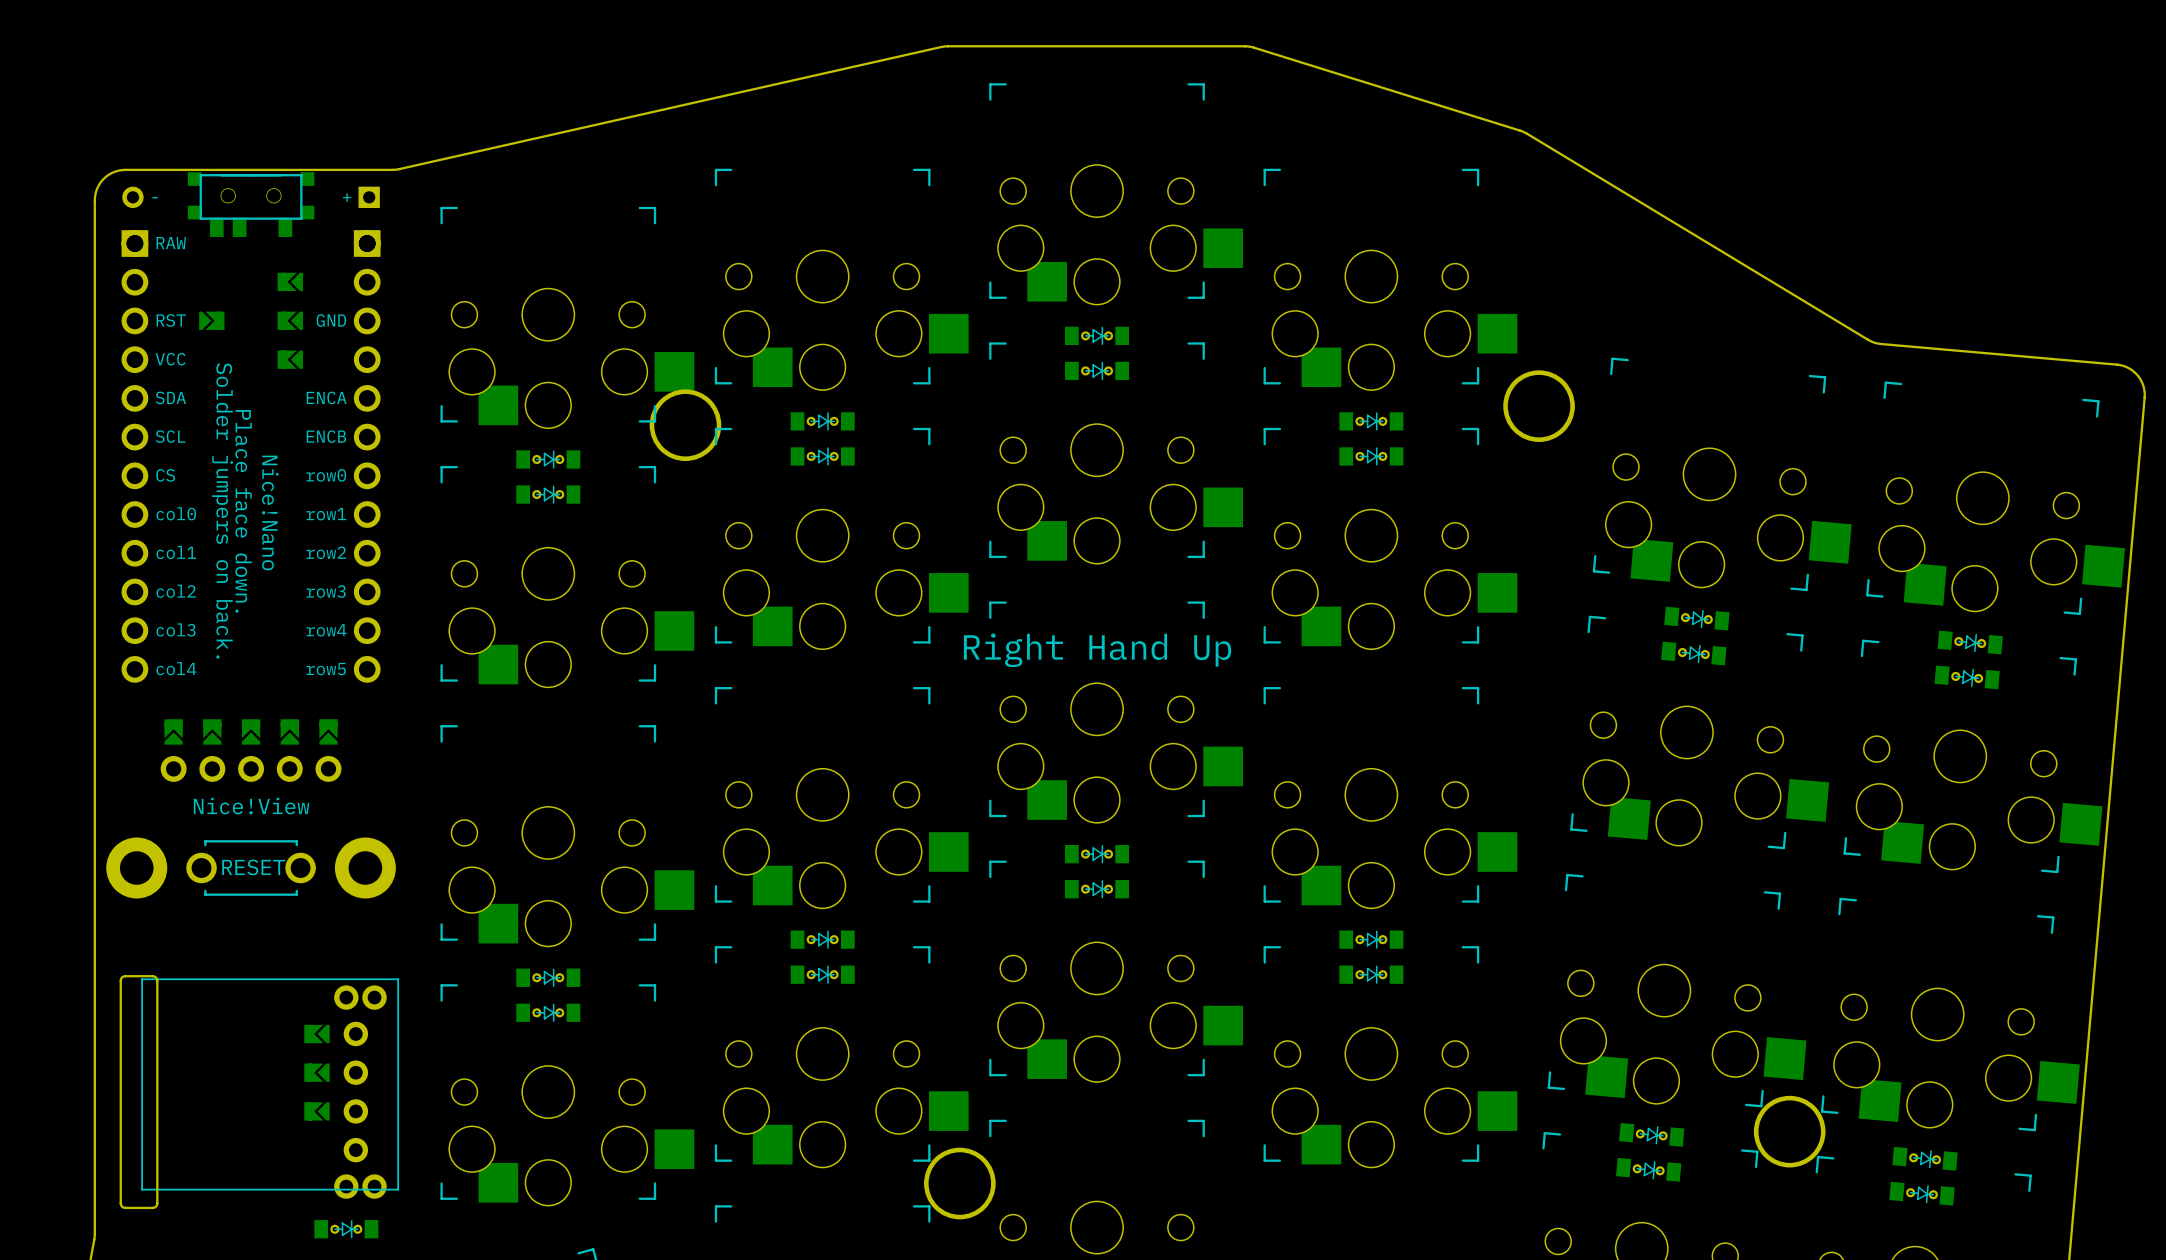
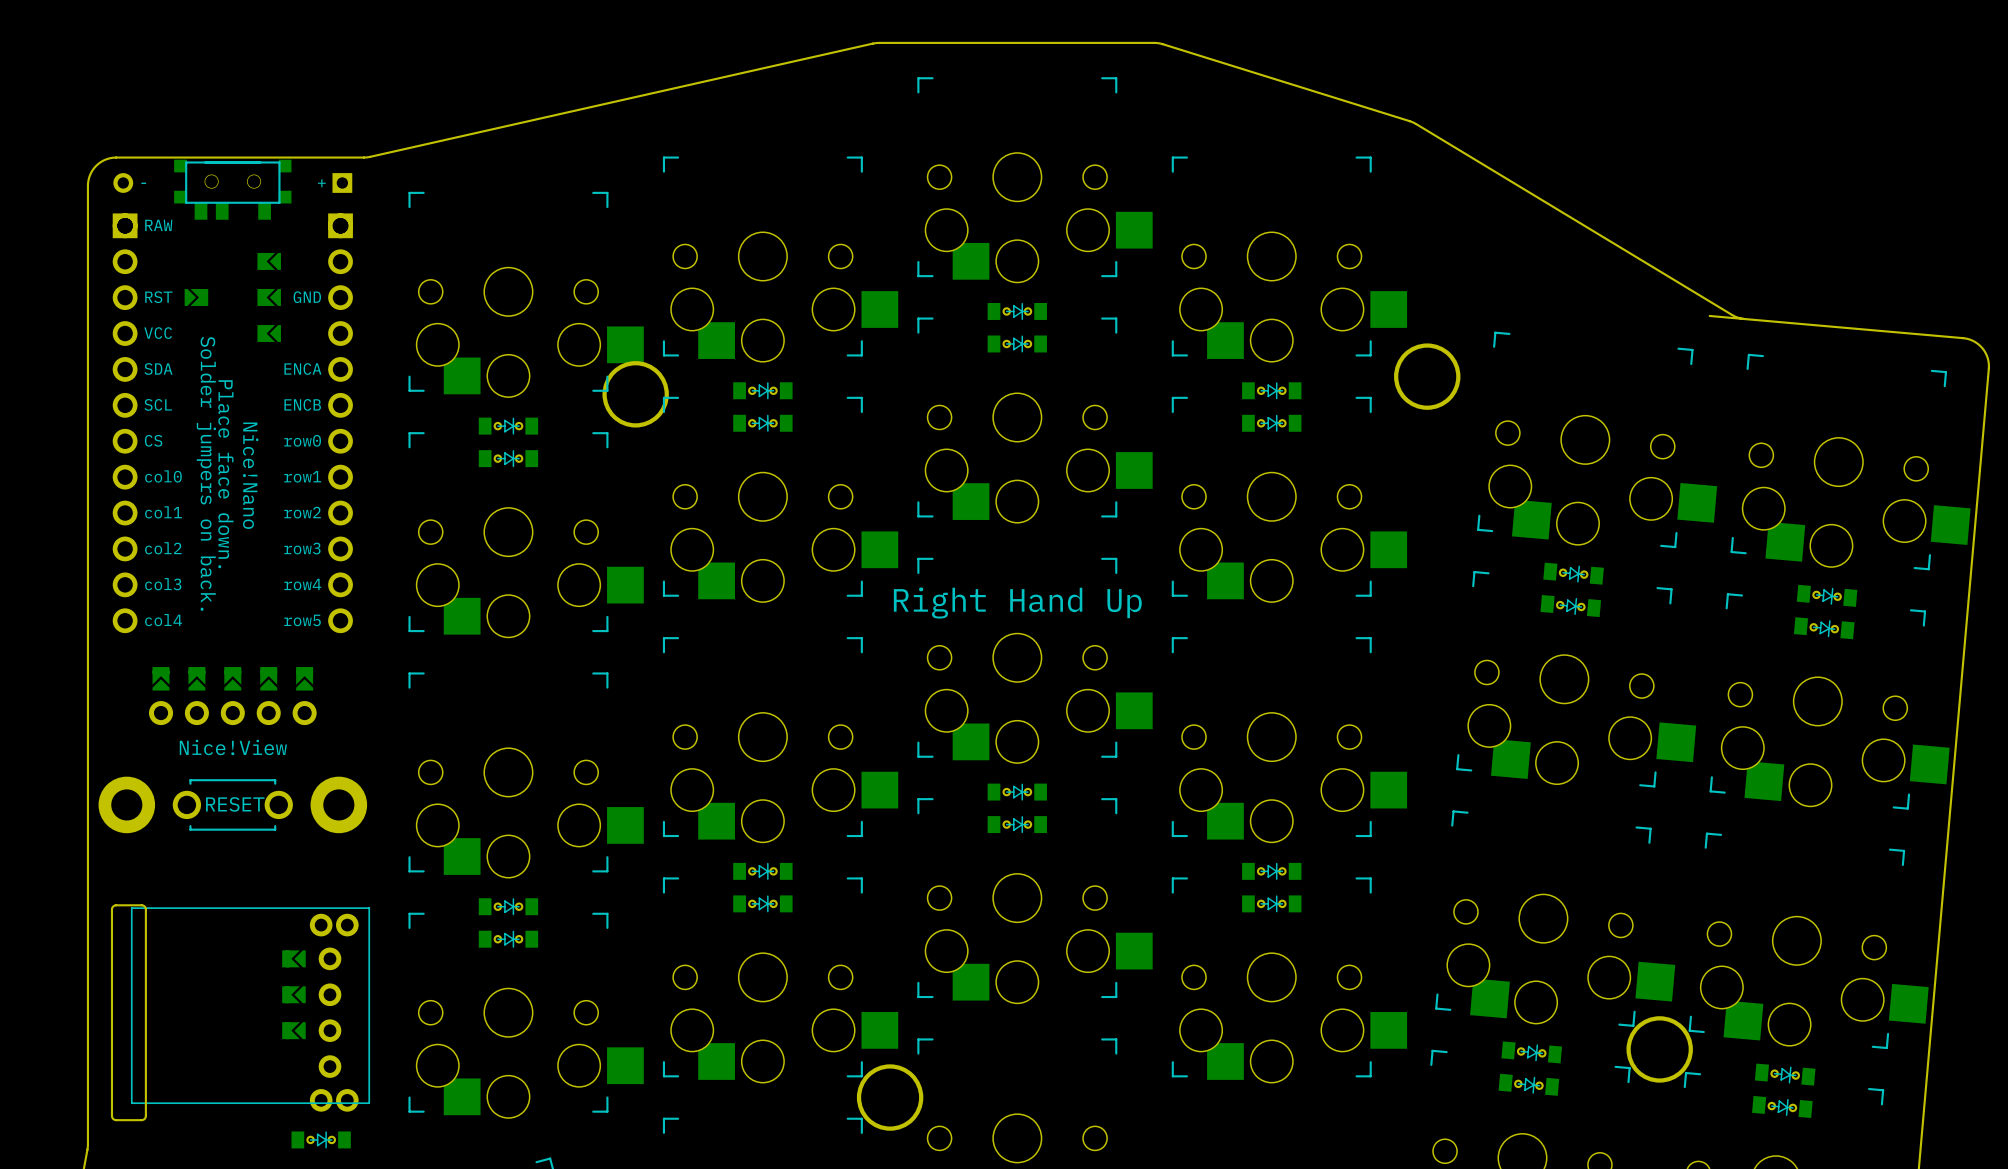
board edge: none -> (1709, 315) (1744, 319)

